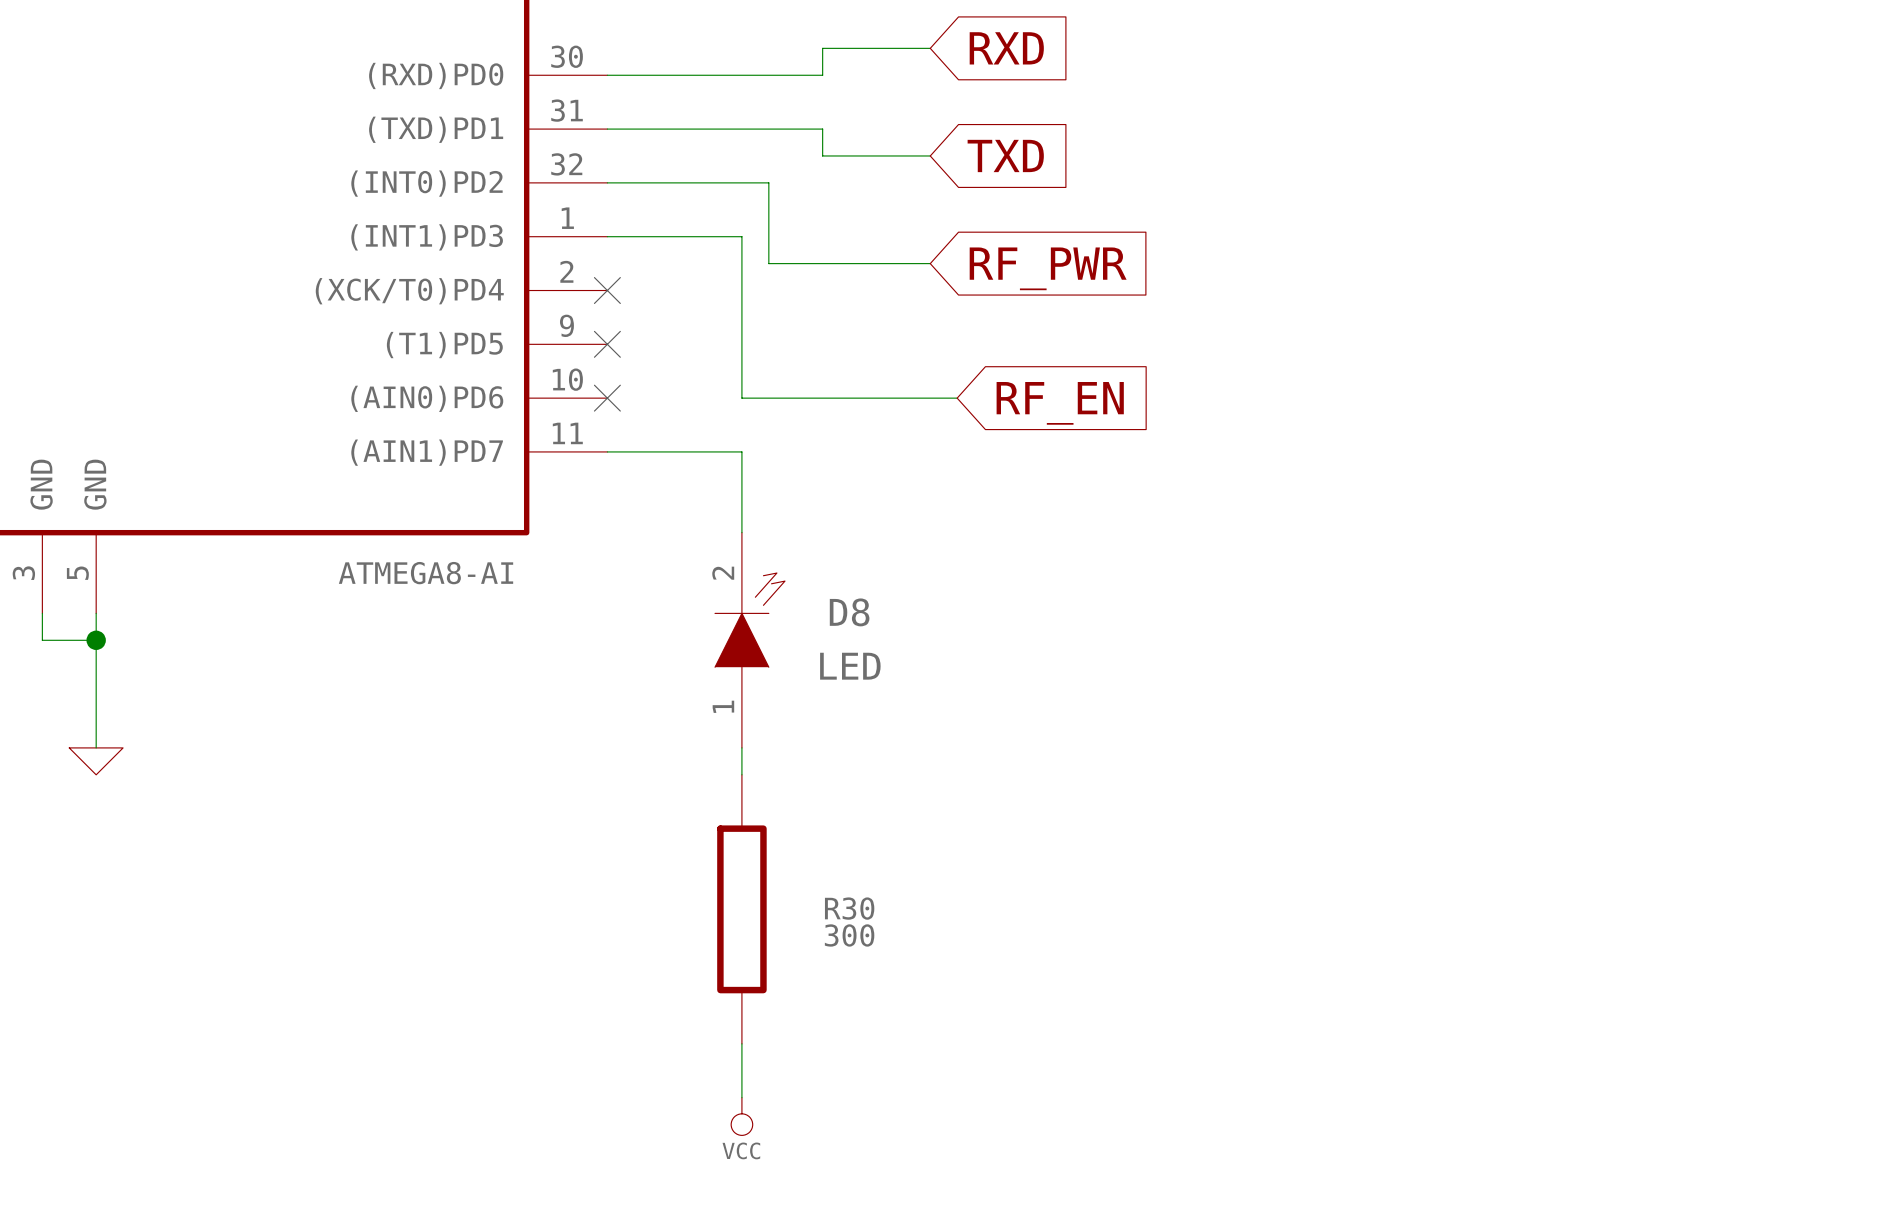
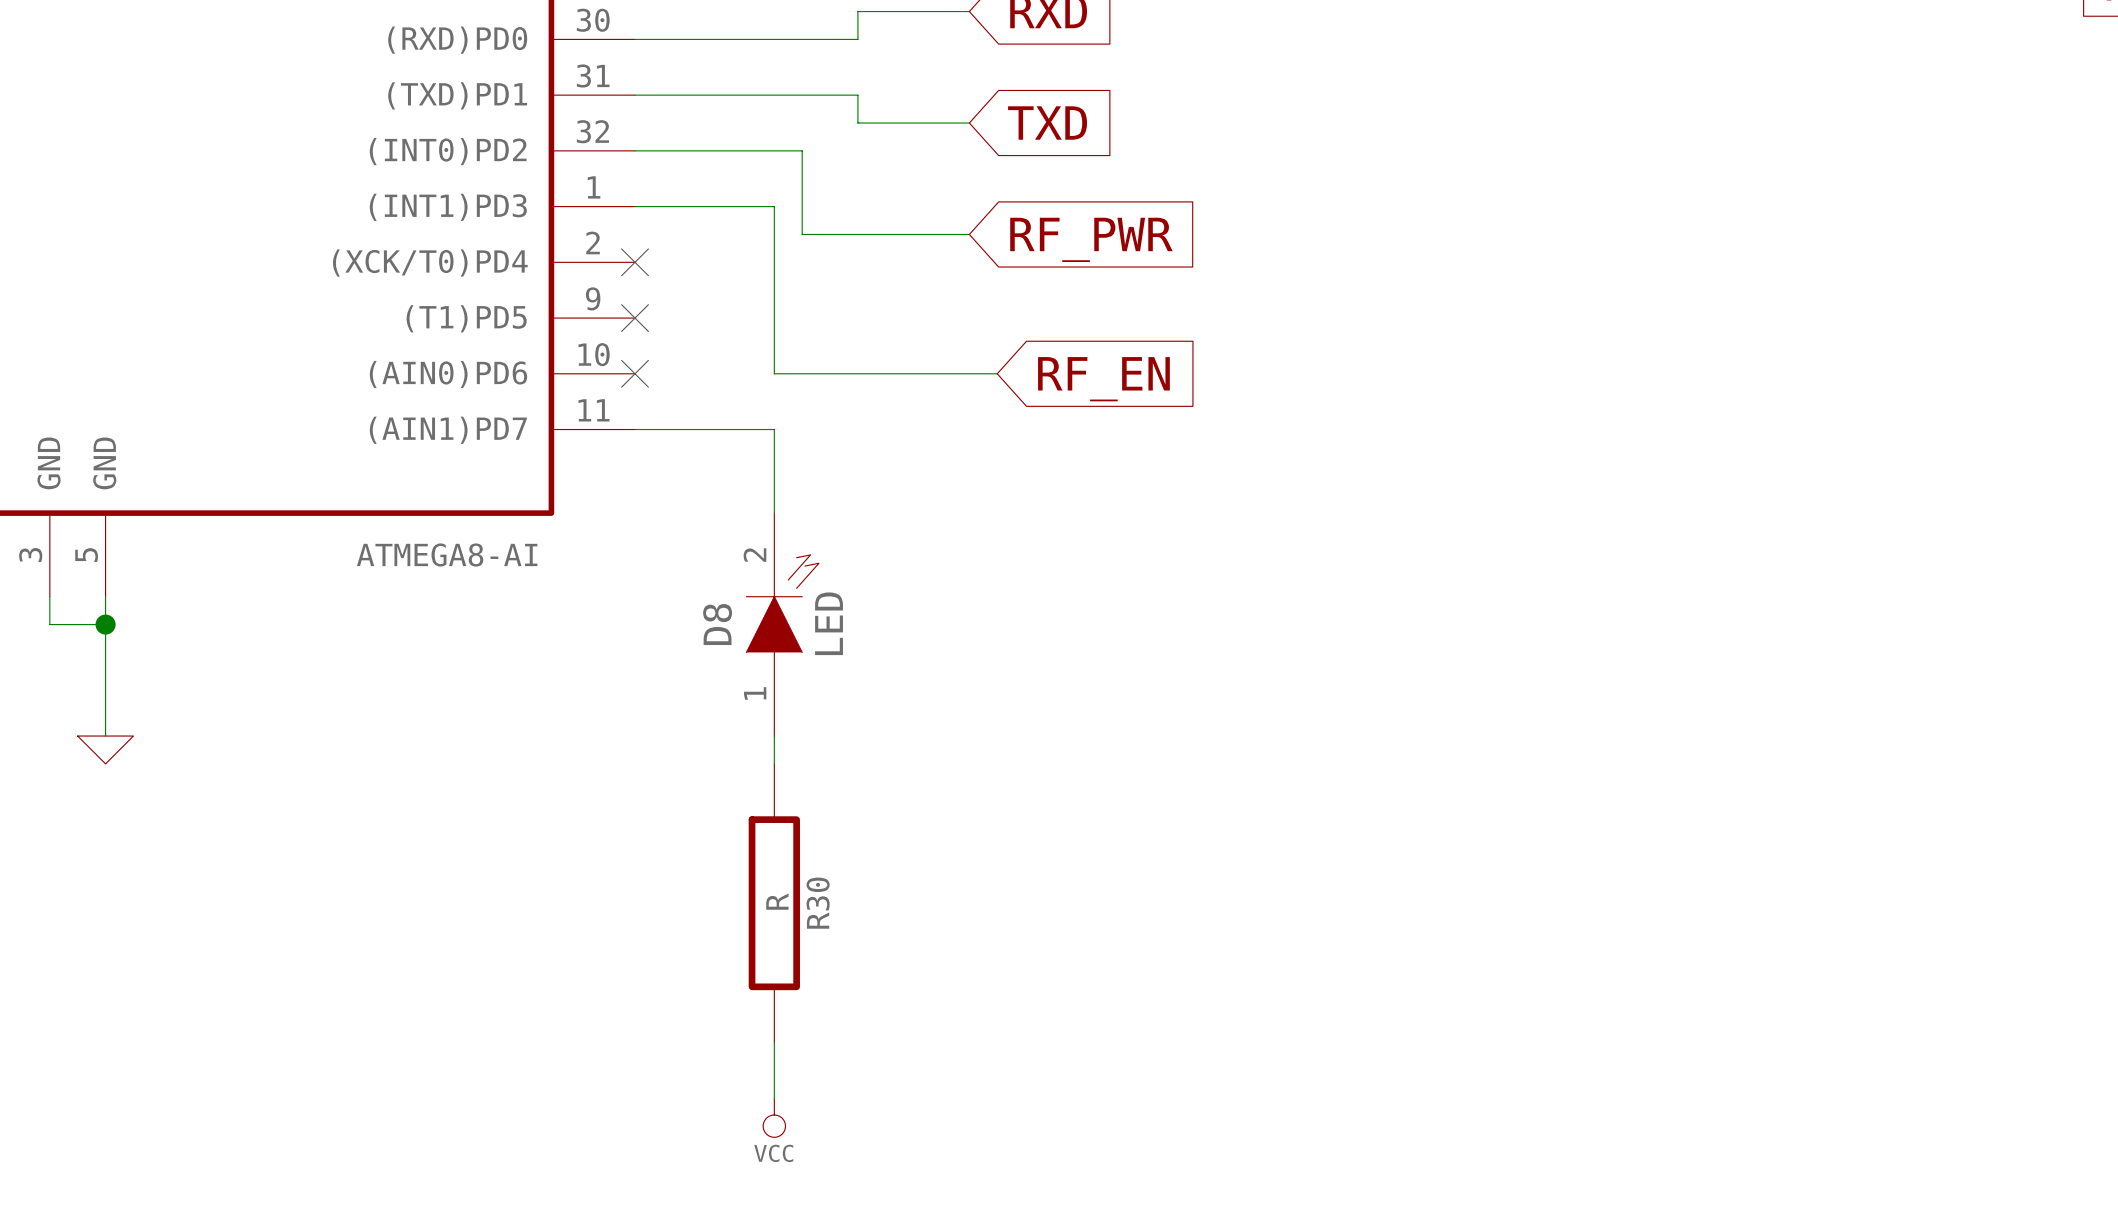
D8 name rotation: 0° (849, 612) -> 90° counterclockwise (717, 624)
D8 name position: D8 (849, 612) -> D8 (717, 624)
D8 value rotation: 0° (850, 666) -> 90° counterclockwise (829, 623)
R30 name rotation: 0° (849, 908) -> 90° counterclockwise (818, 903)
R30 value: 300 (849, 935) -> R (777, 901)

